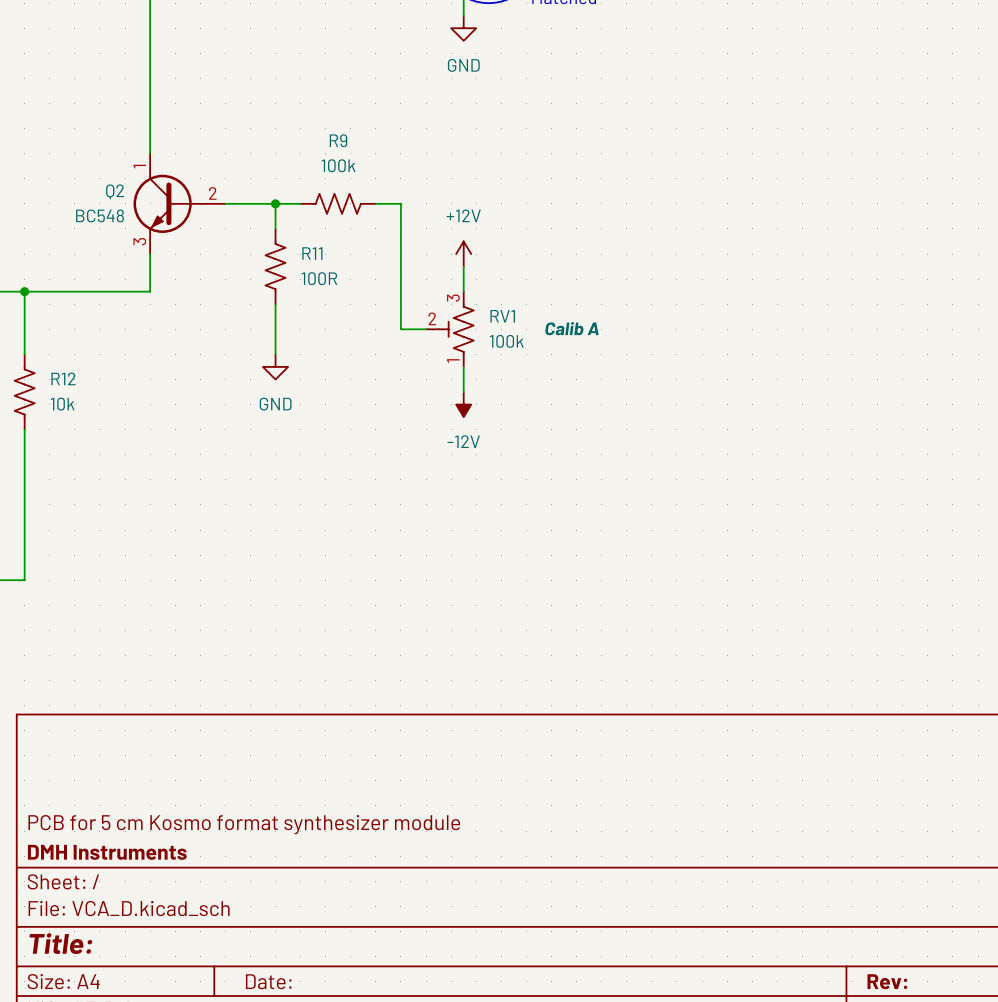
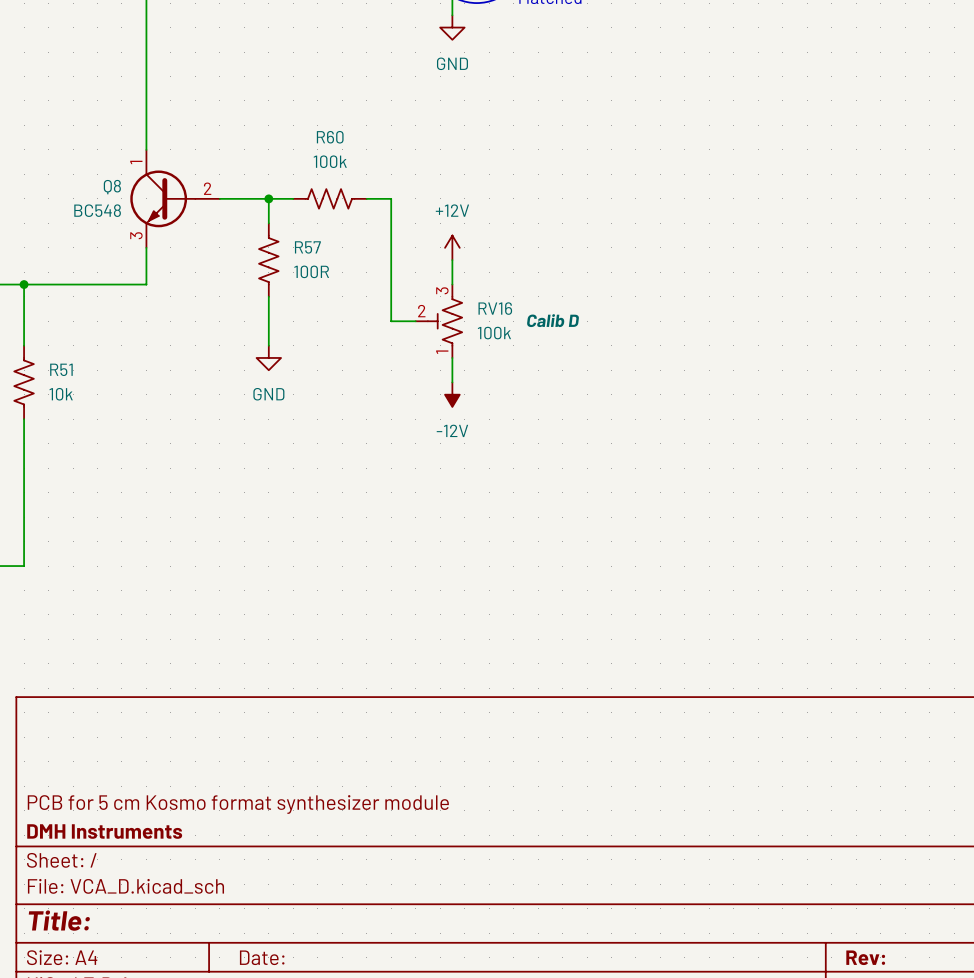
R9 name: R9 (338, 140) -> R60 (330, 137)
Q2 name: Q2 (115, 191) -> Q8 (112, 187)
R11 name: R11 (312, 253) -> R57 (307, 247)
RV1 name: RV1 (502, 316) -> RV16 (495, 308)
RV1 text: Calib A (571, 328) -> Calib D (553, 320)
R12 name: R12 (63, 378) -> R51 (61, 369)

